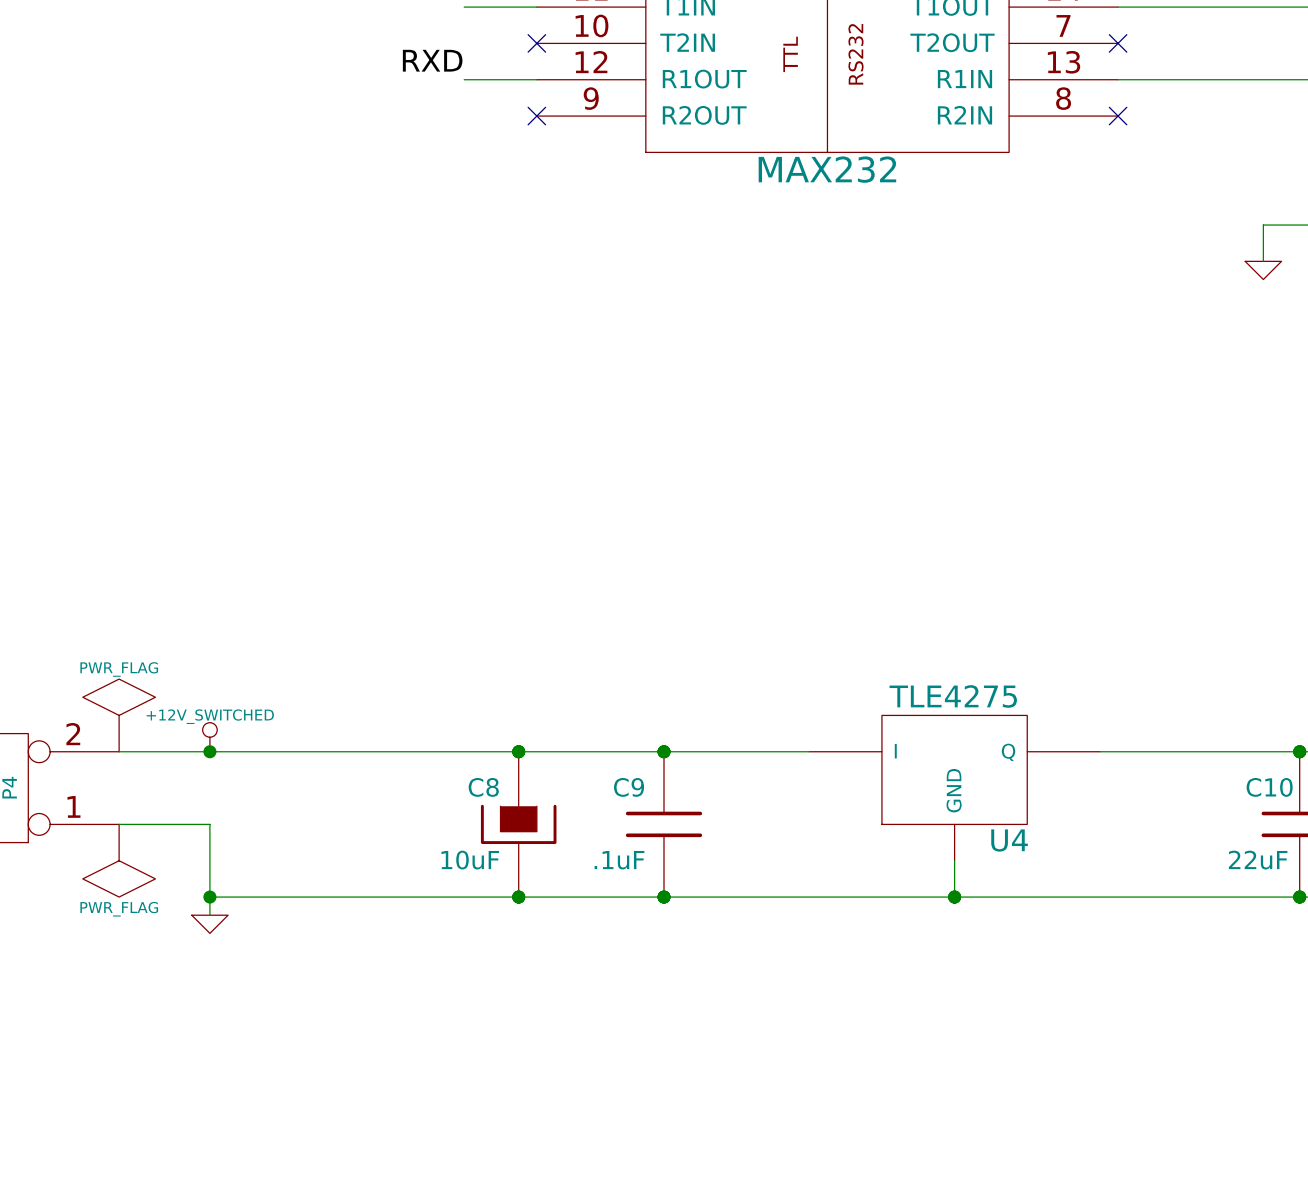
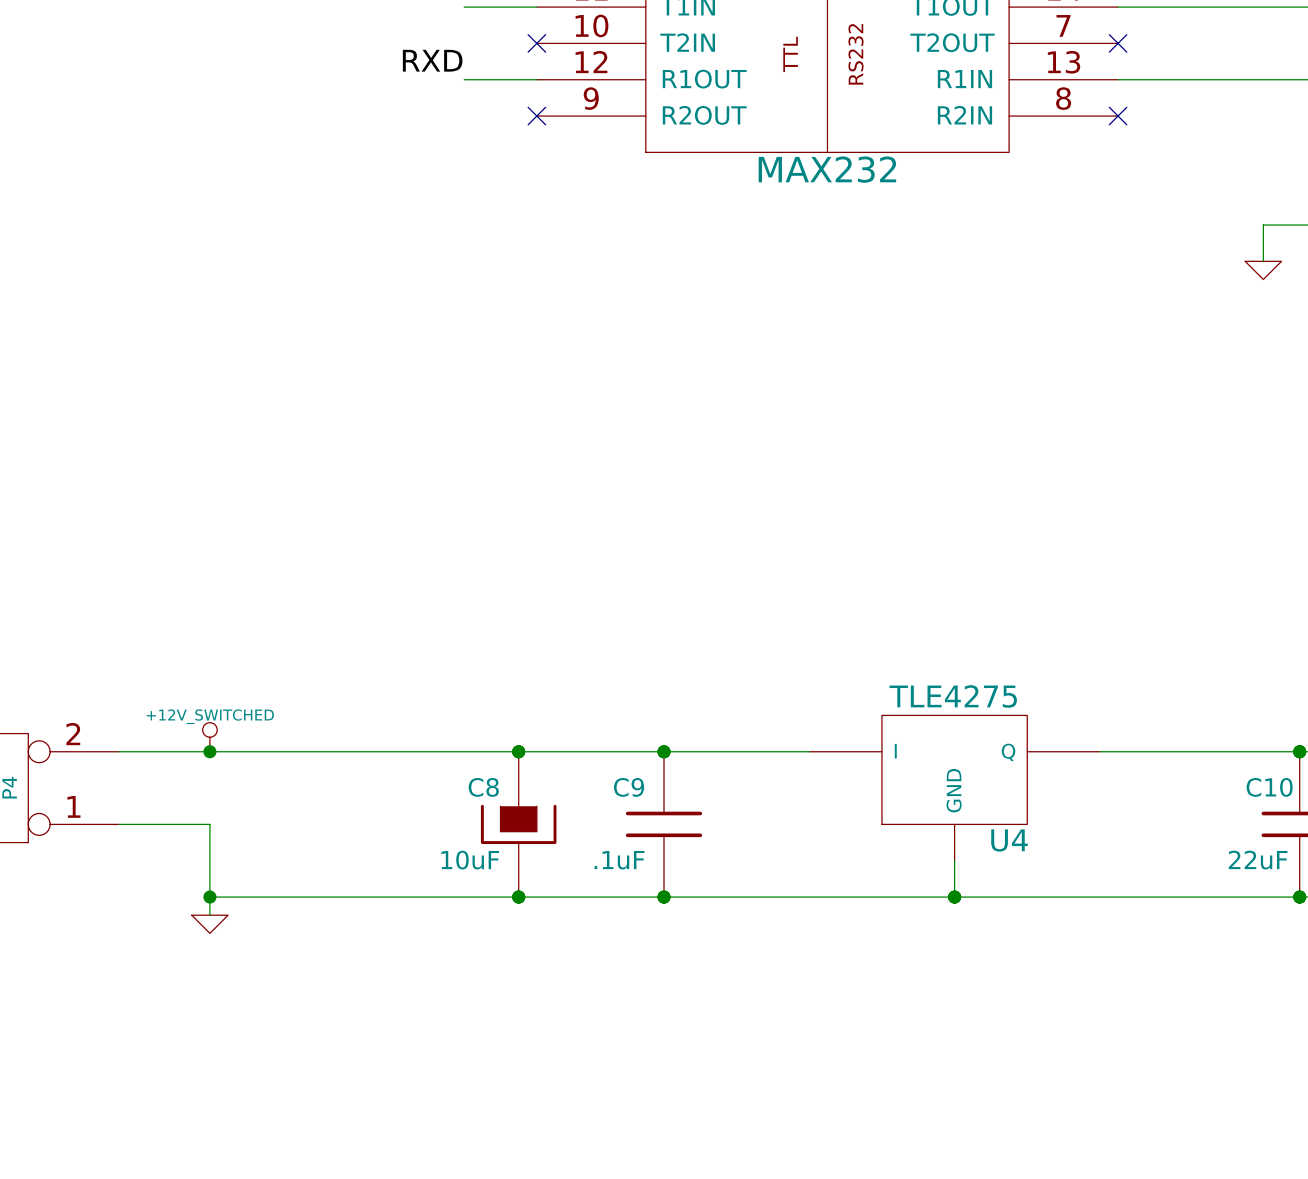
power symbol: PWR_FLAG (119, 715) -> none
power symbol: PWR_FLAG (119, 860) -> none

